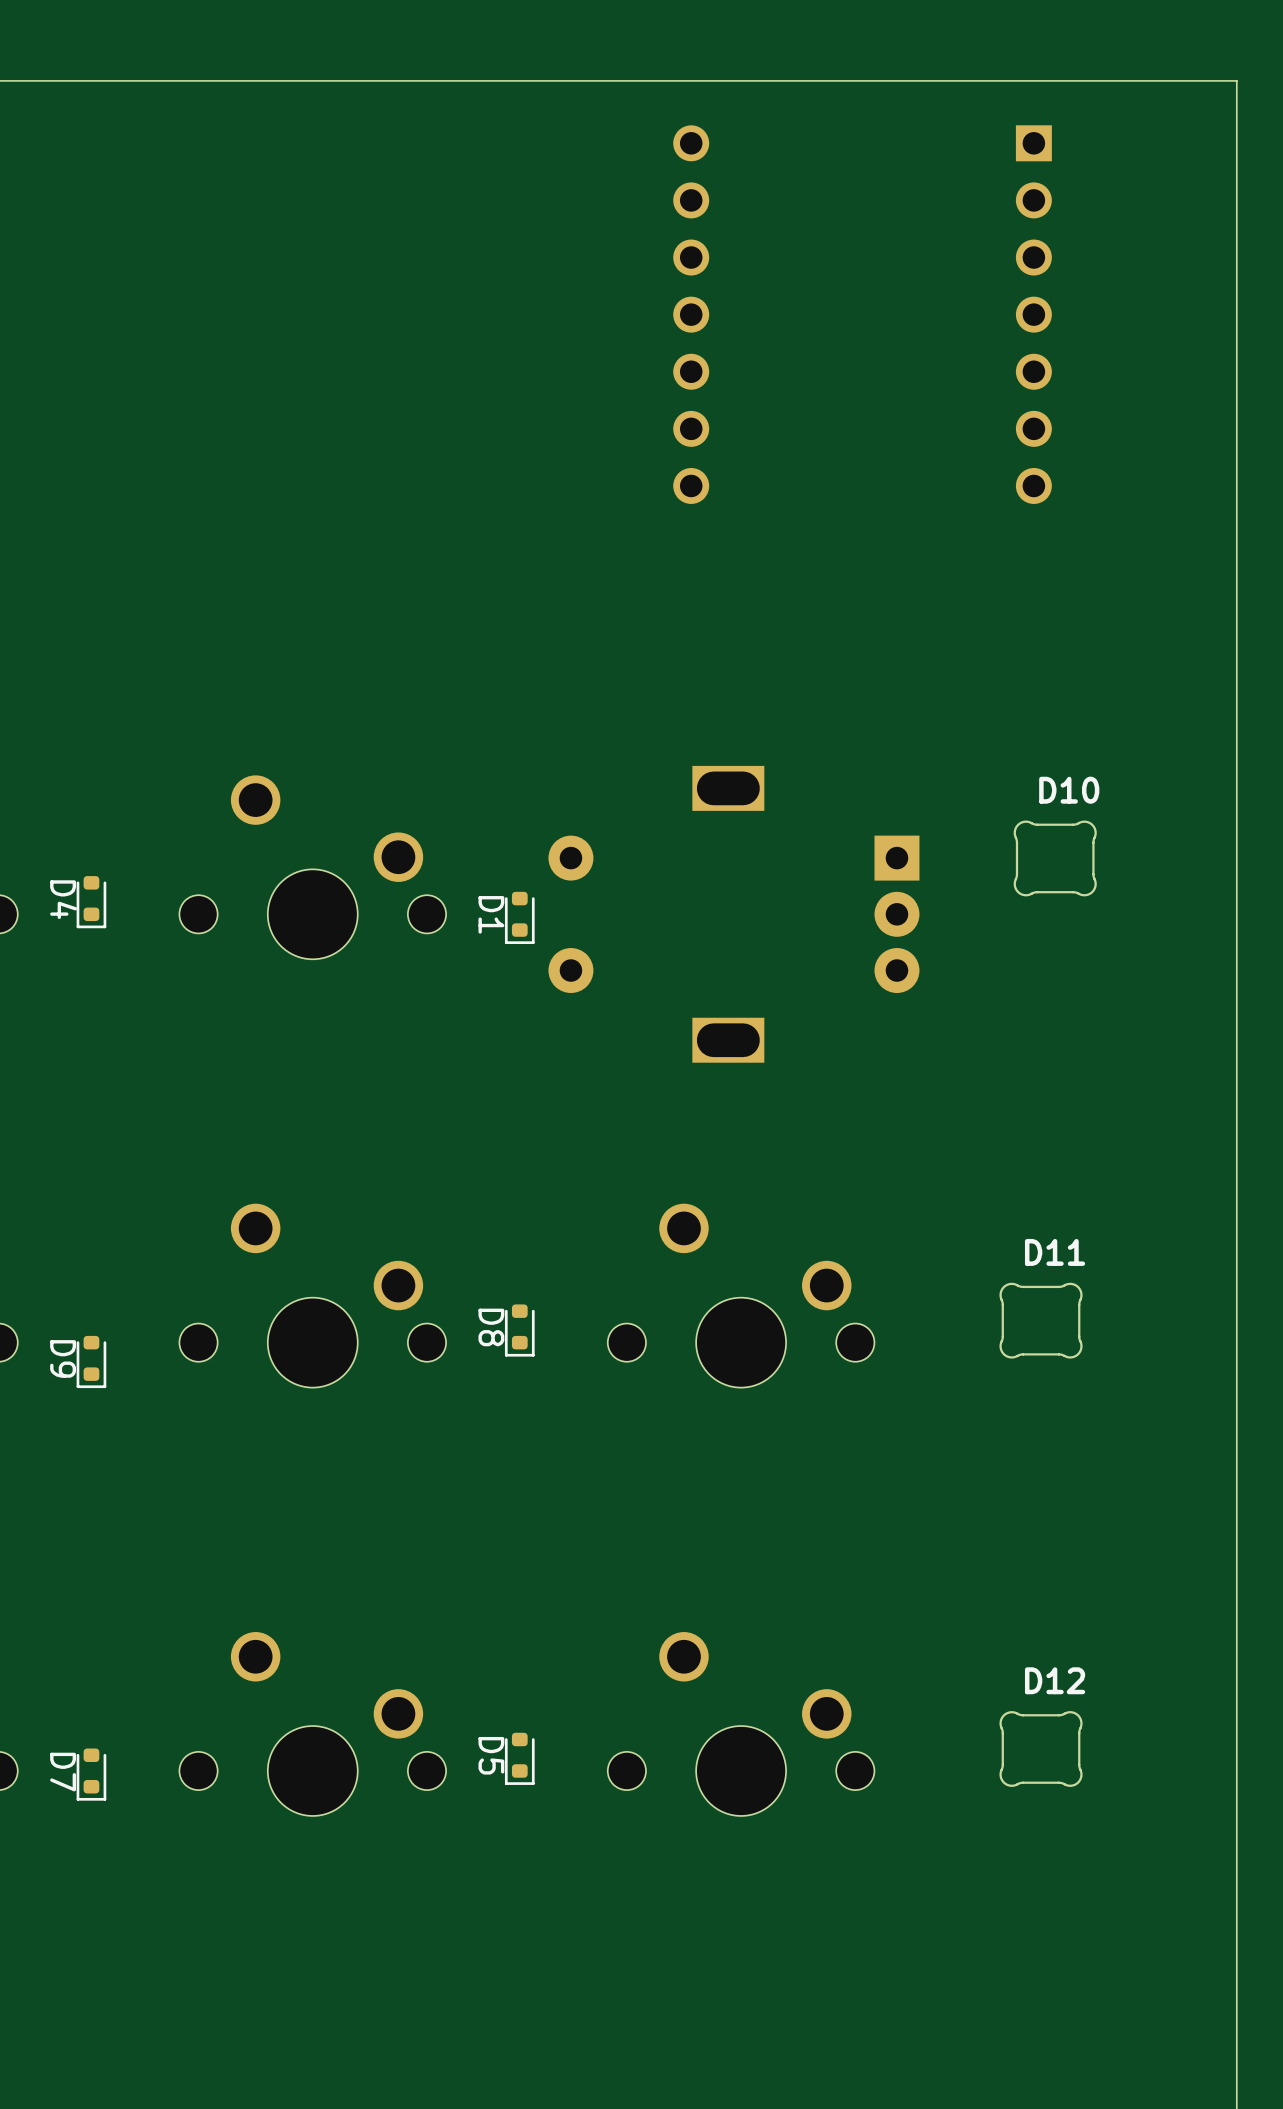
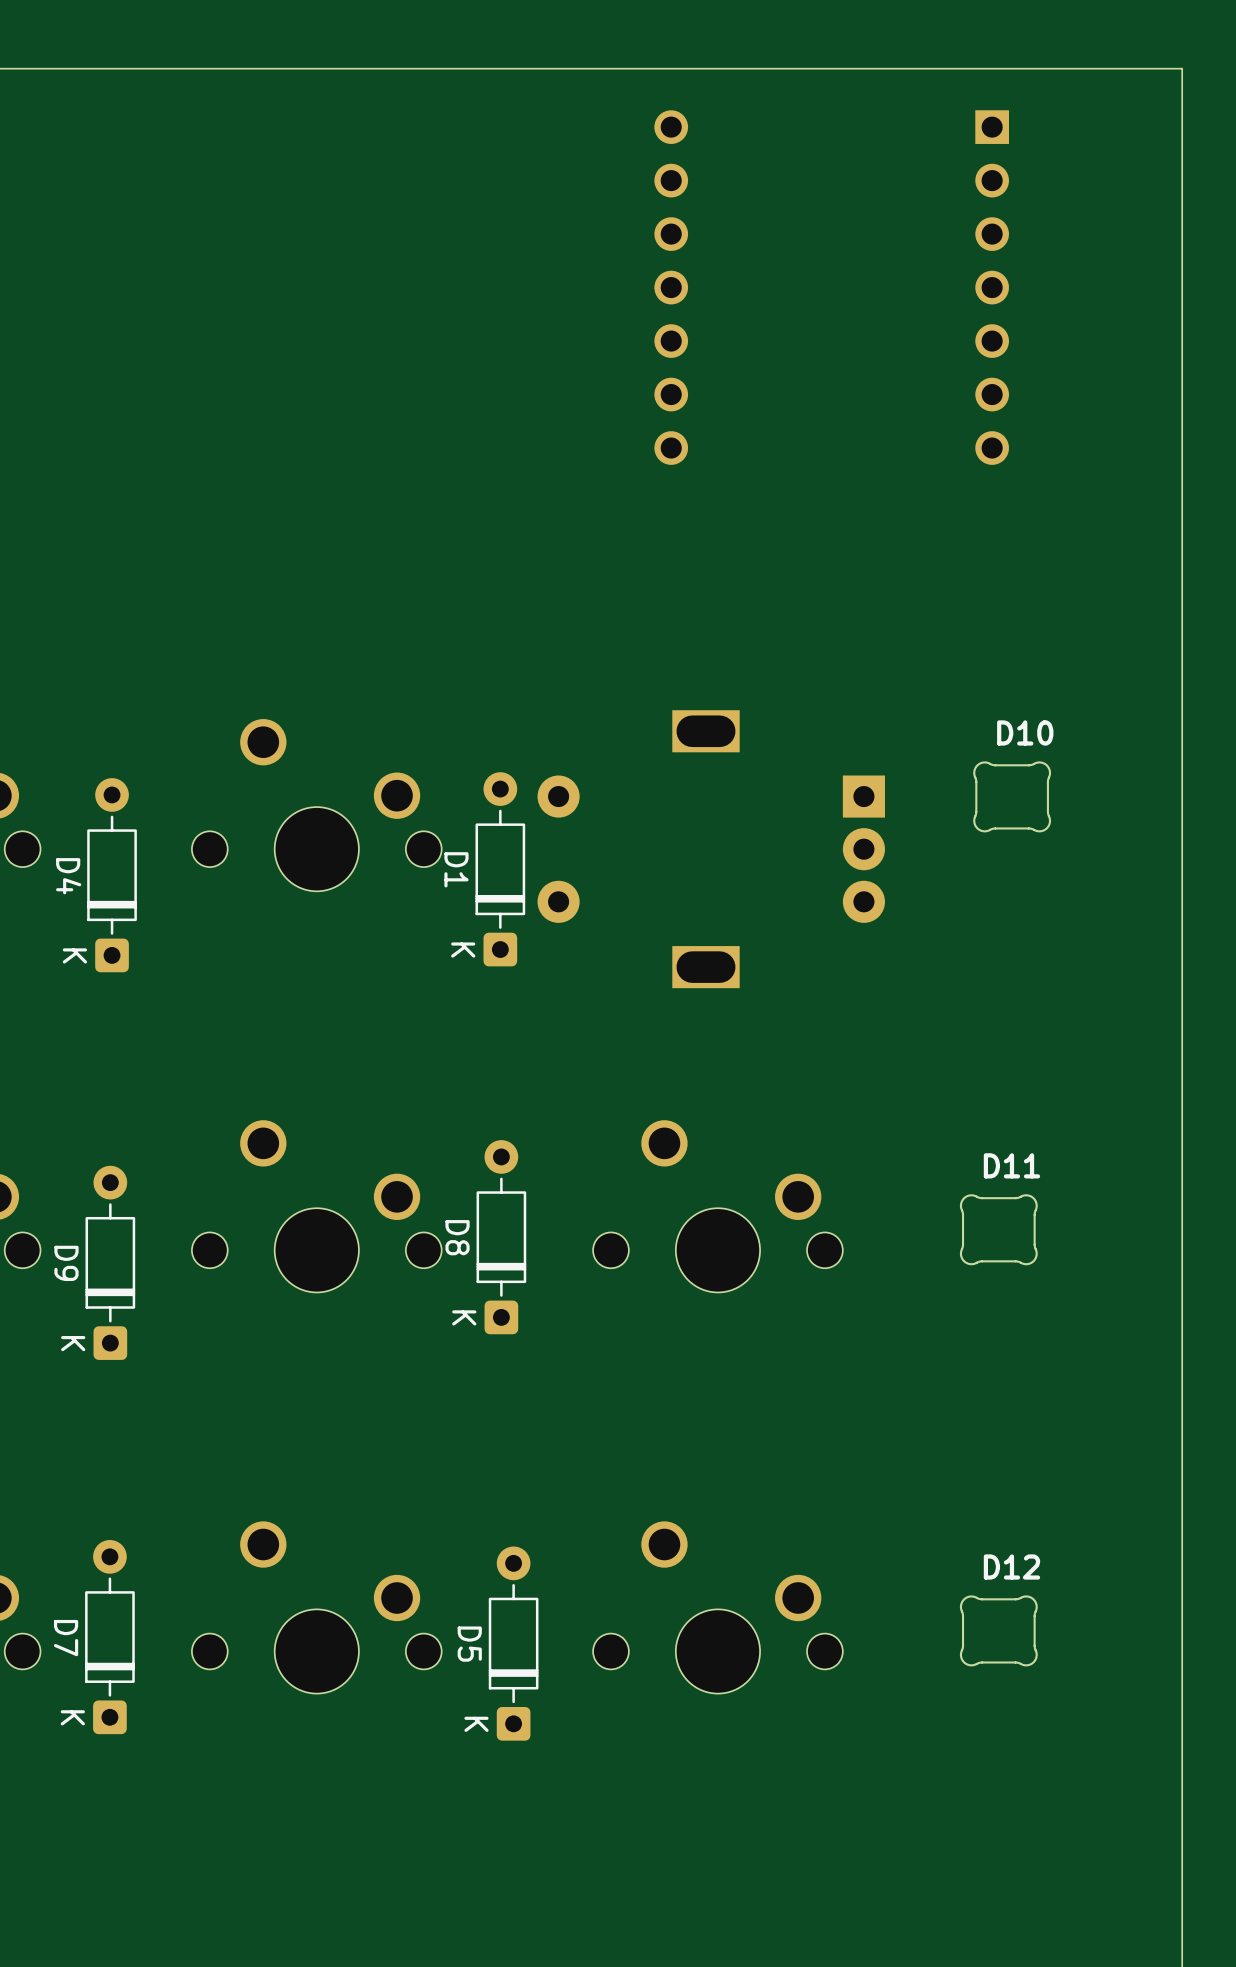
D4 footprint: [76, 876, 107, 929] -> [87, 778, 137, 973]
D1 footprint: [504, 891, 535, 944] -> [475, 772, 526, 967]
D8 footprint: [504, 1304, 535, 1357] -> [476, 1140, 527, 1335]
D9 footprint: [76, 1335, 107, 1389] -> [85, 1165, 136, 1360]
D5 footprint: [504, 1732, 535, 1785] -> [488, 1546, 539, 1741]
D7 footprint: [76, 1748, 107, 1801] -> [85, 1539, 135, 1735]

